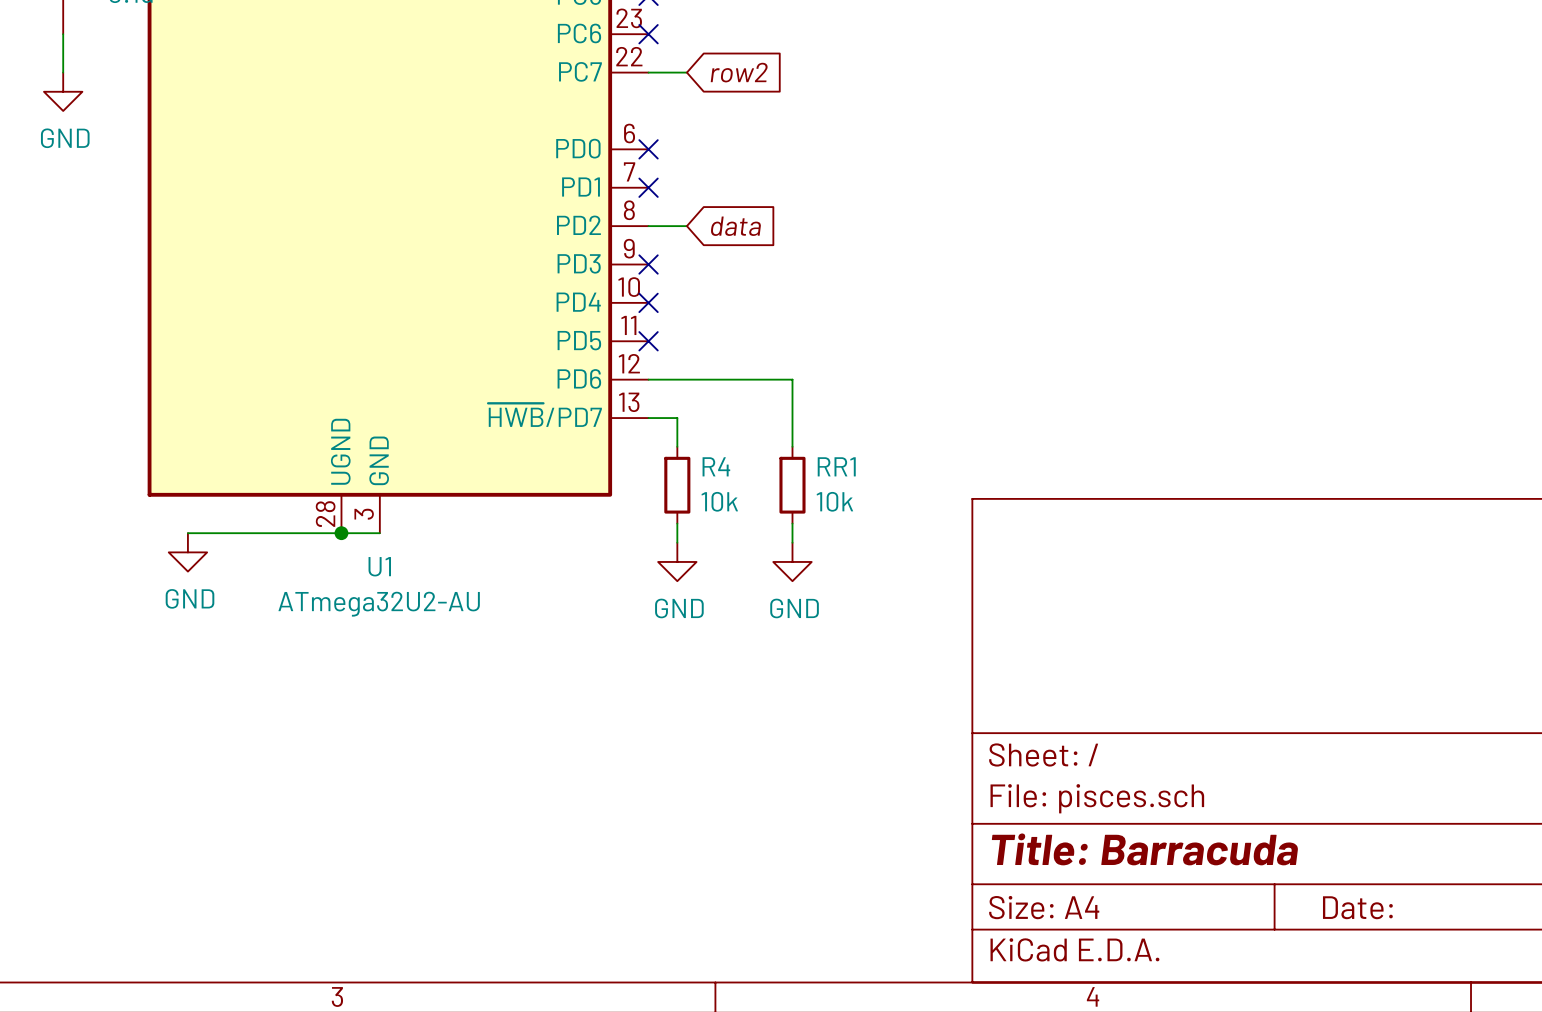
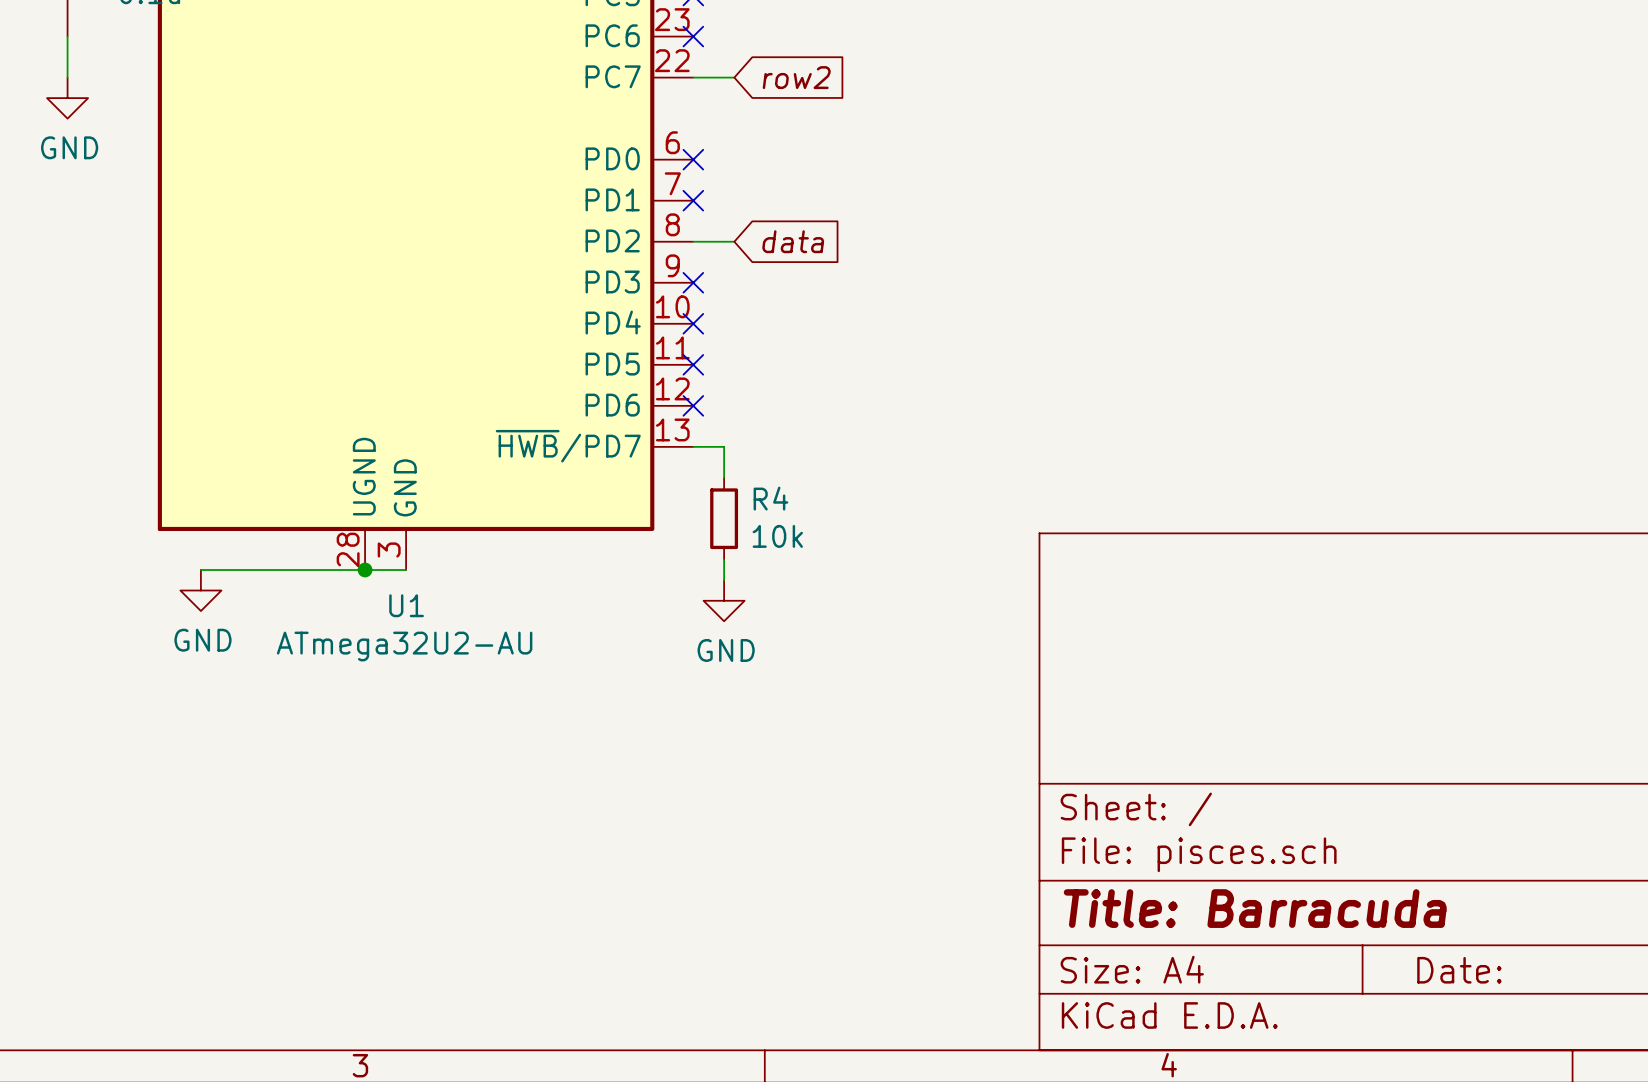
wire: (648, 379) (792, 379) (792, 446) -> none
no-connect mark: none -> (693, 405)
RR1: 10k (792, 485) -> none
wire: (792, 523) (792, 542) -> none
power symbol: GND (792, 561) -> none

